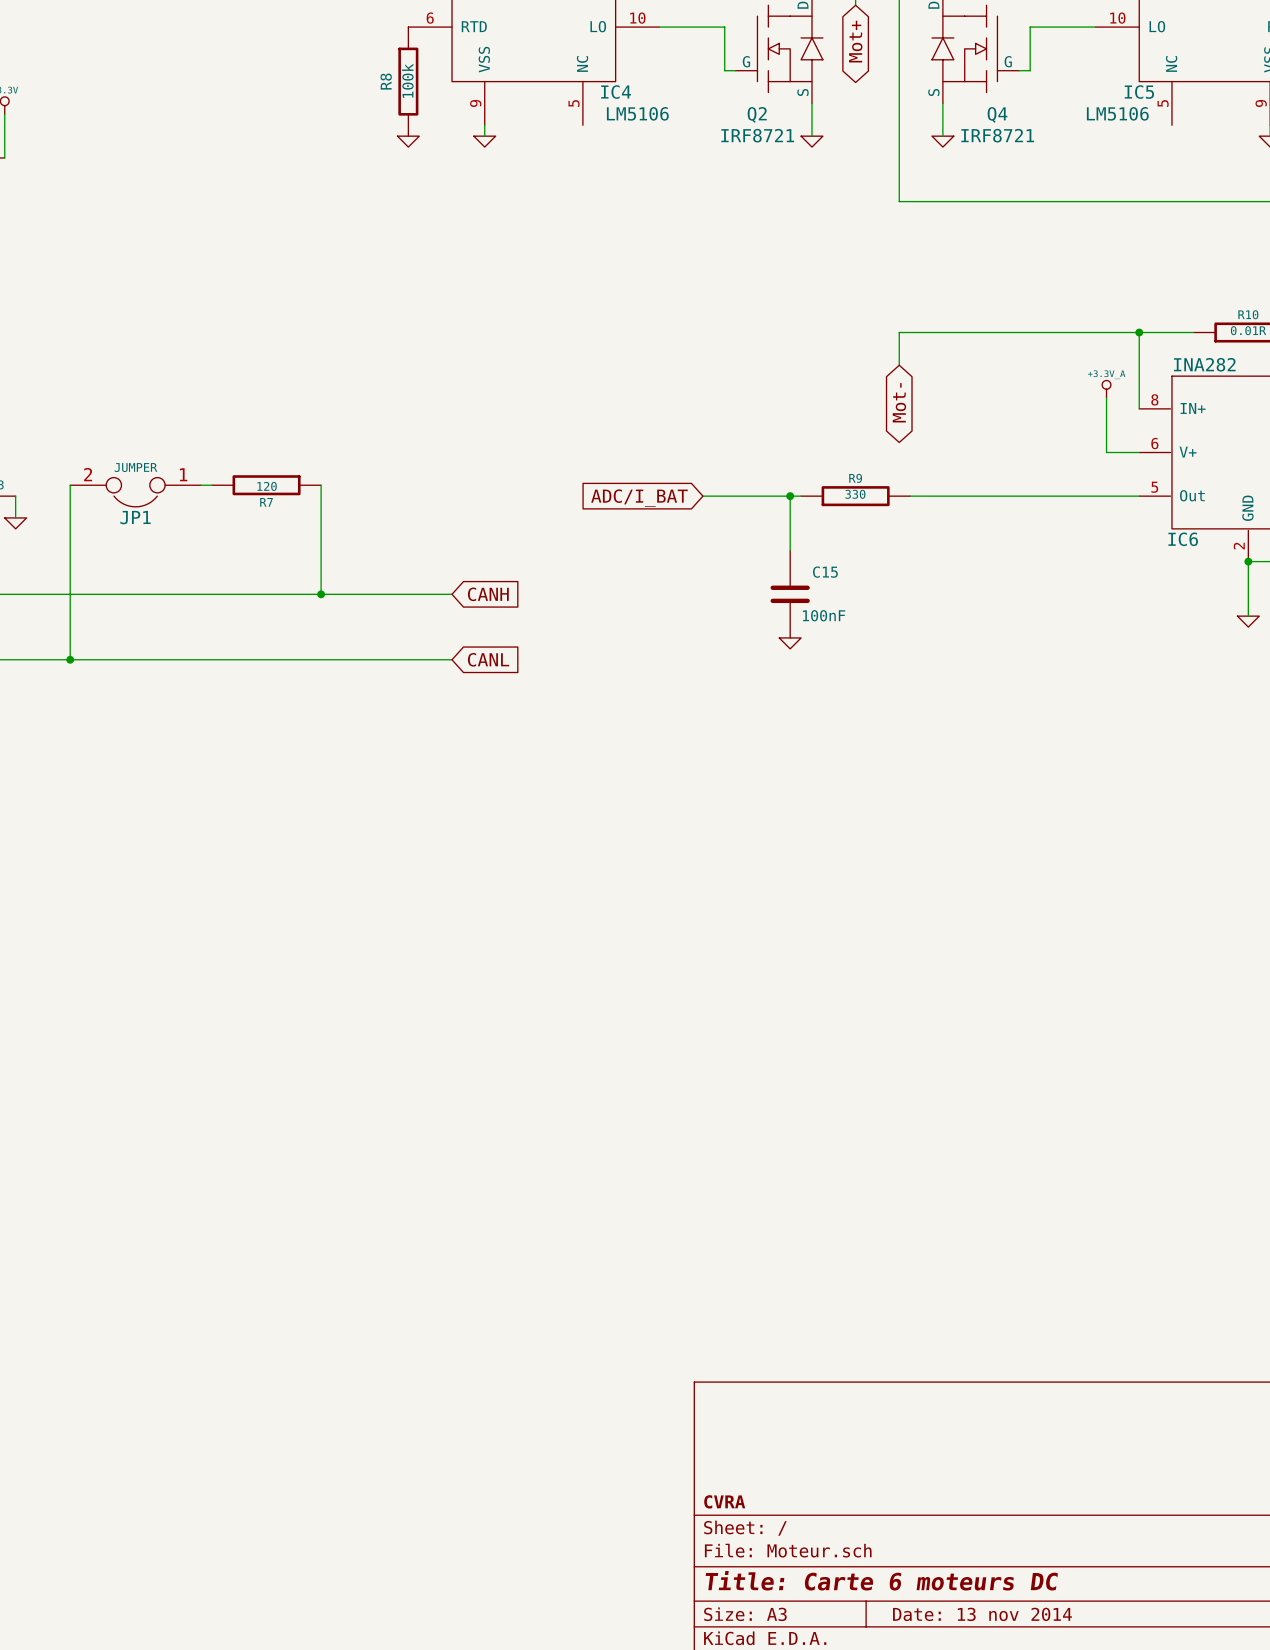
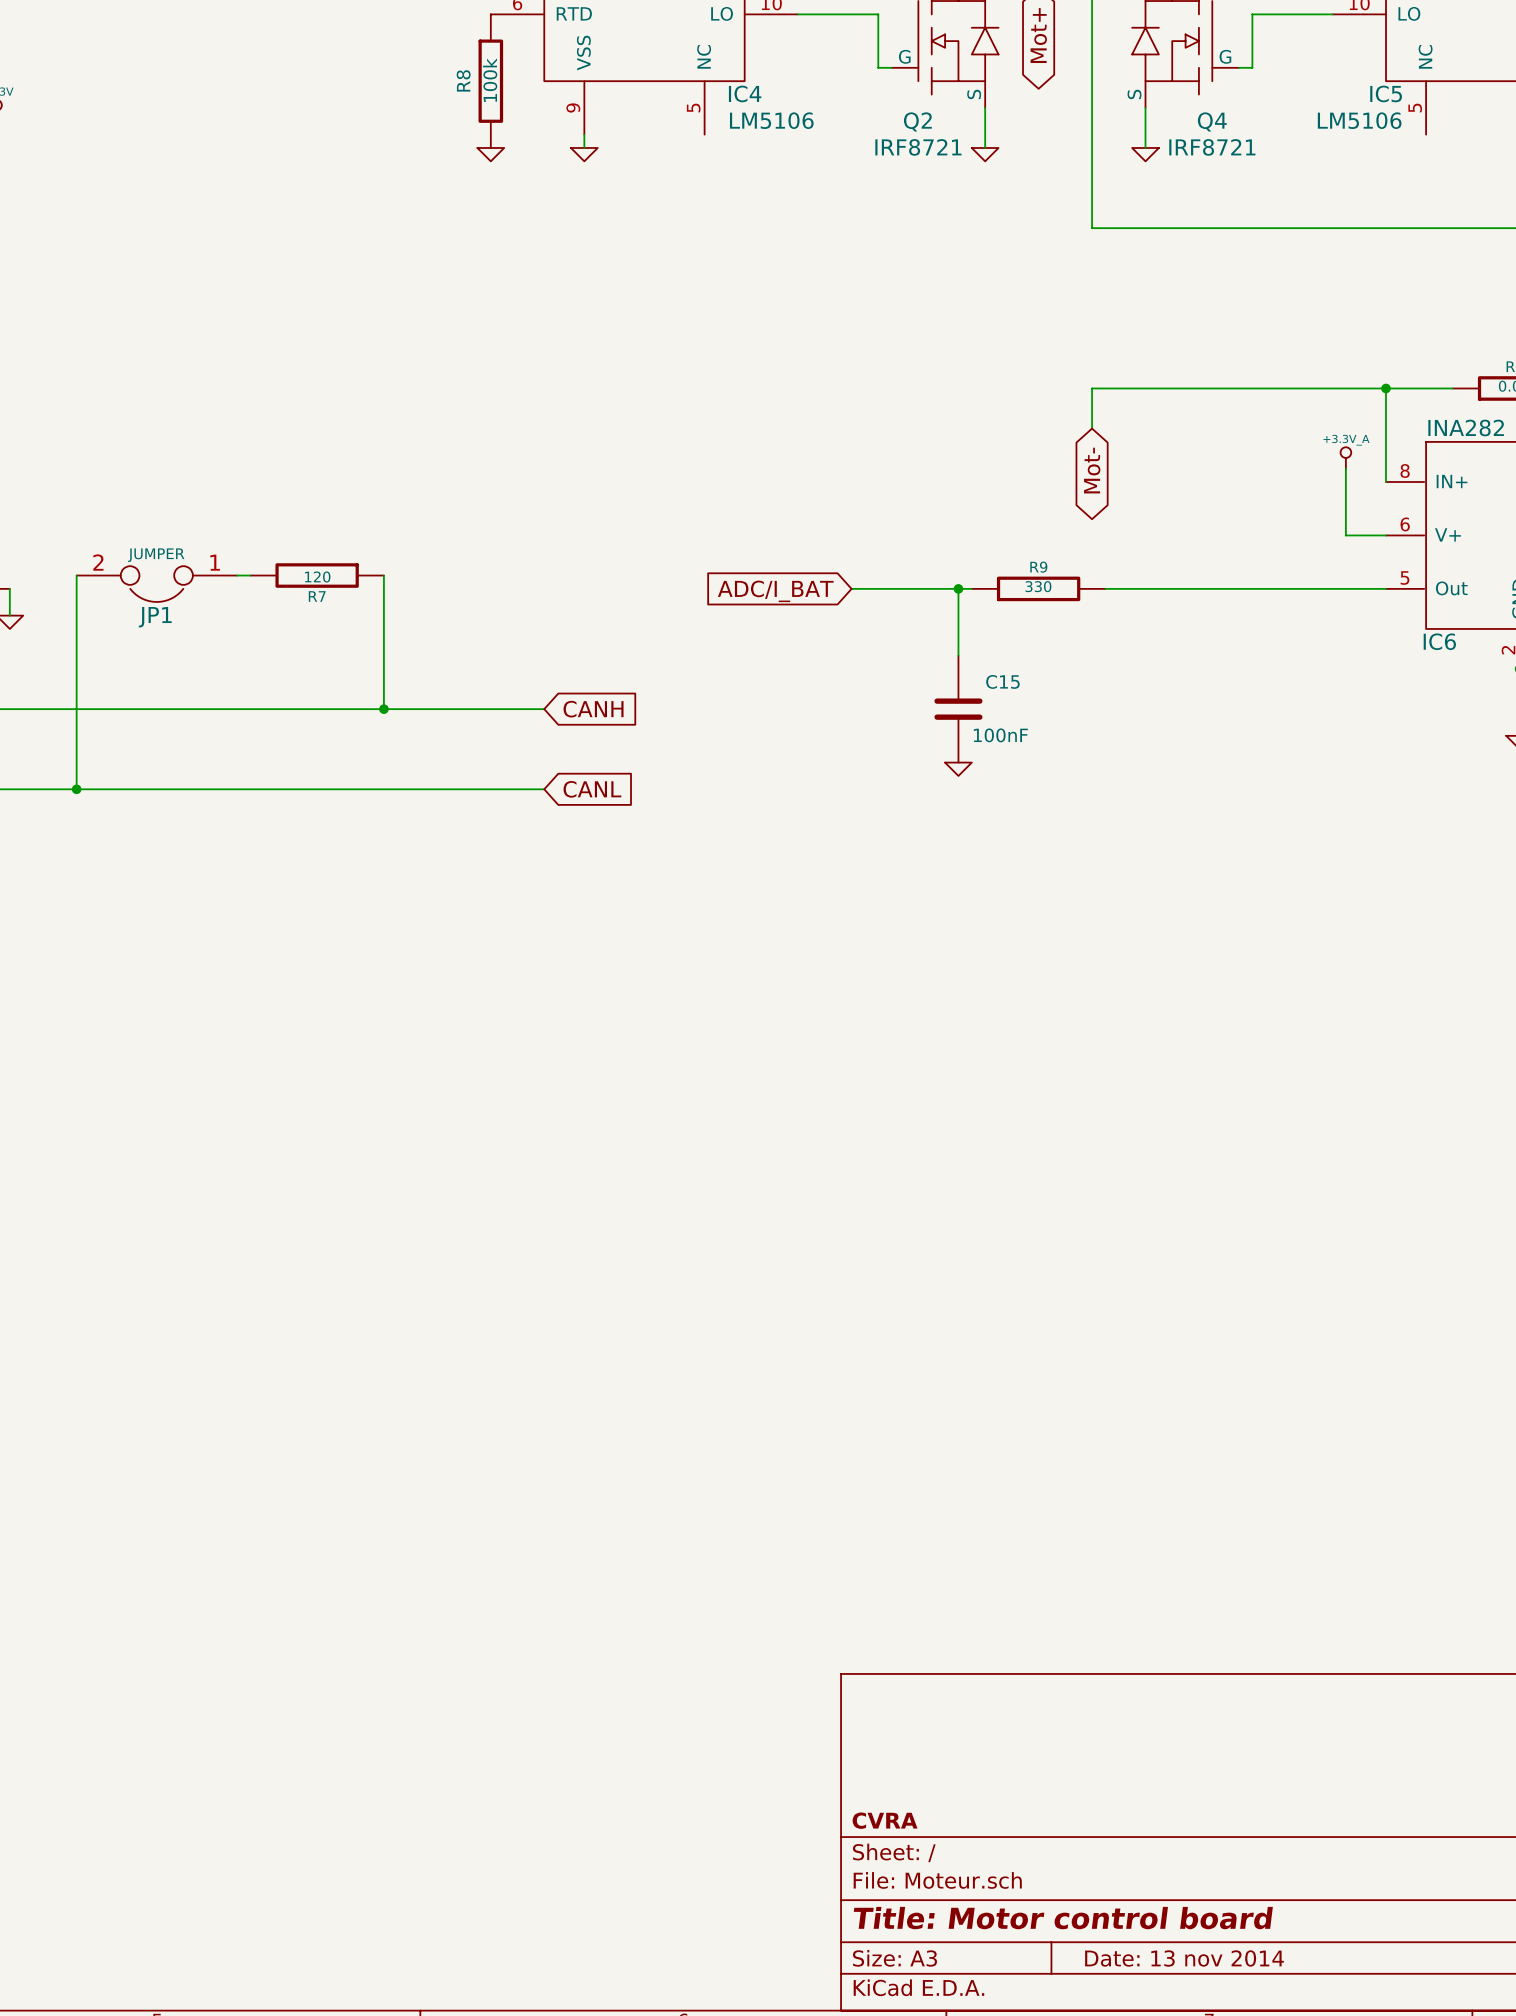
title block: Title: Carte 6 moteurs DC (881, 1580) -> Title: Motor control board (1063, 1918)

